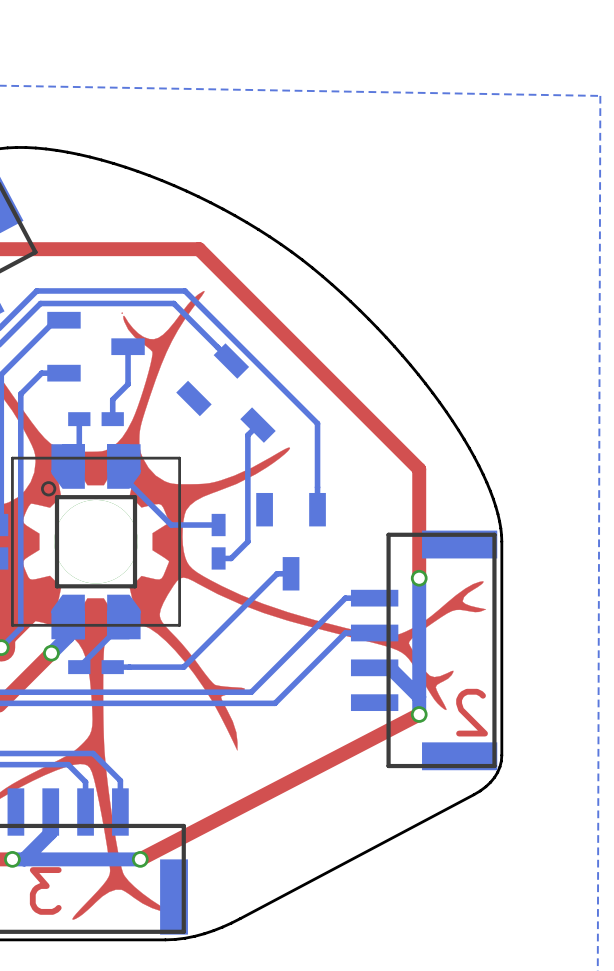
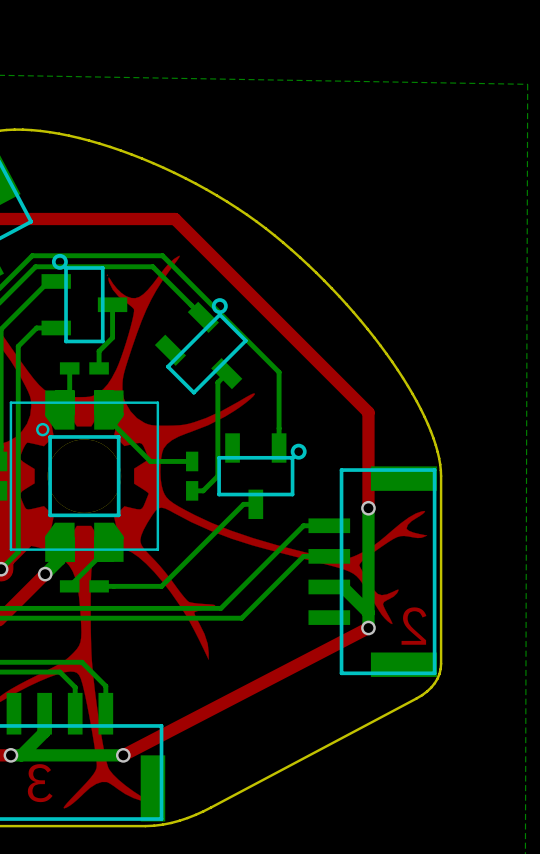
part footprint: [47, 311, 145, 382] -> [41, 253, 128, 344]
part footprint: [176, 343, 276, 443] -> [154, 298, 248, 395]
part footprint: [256, 492, 326, 591] -> [217, 433, 307, 520]

